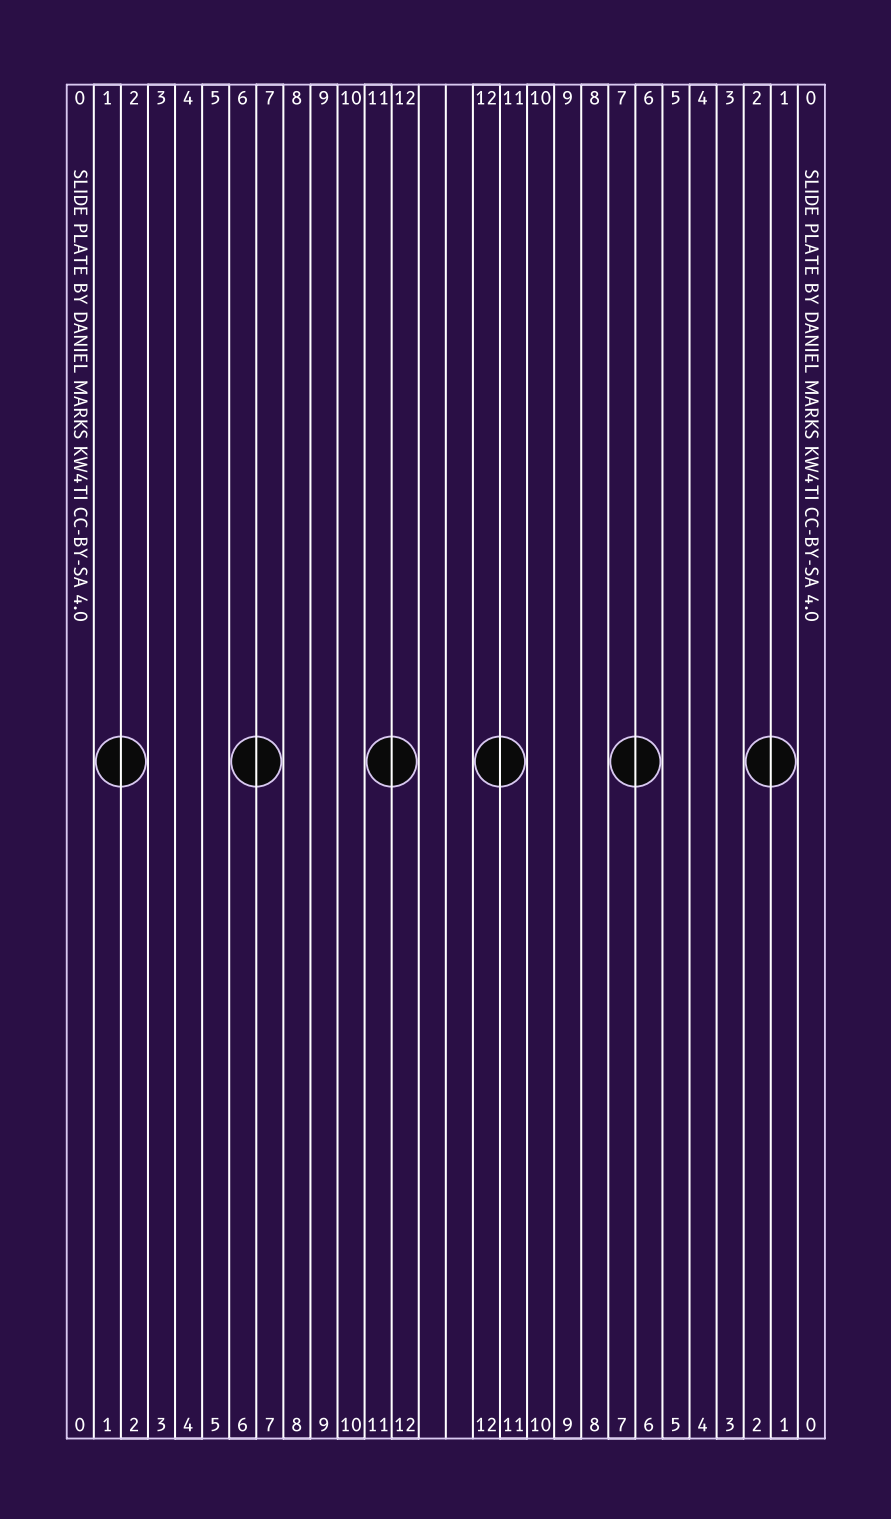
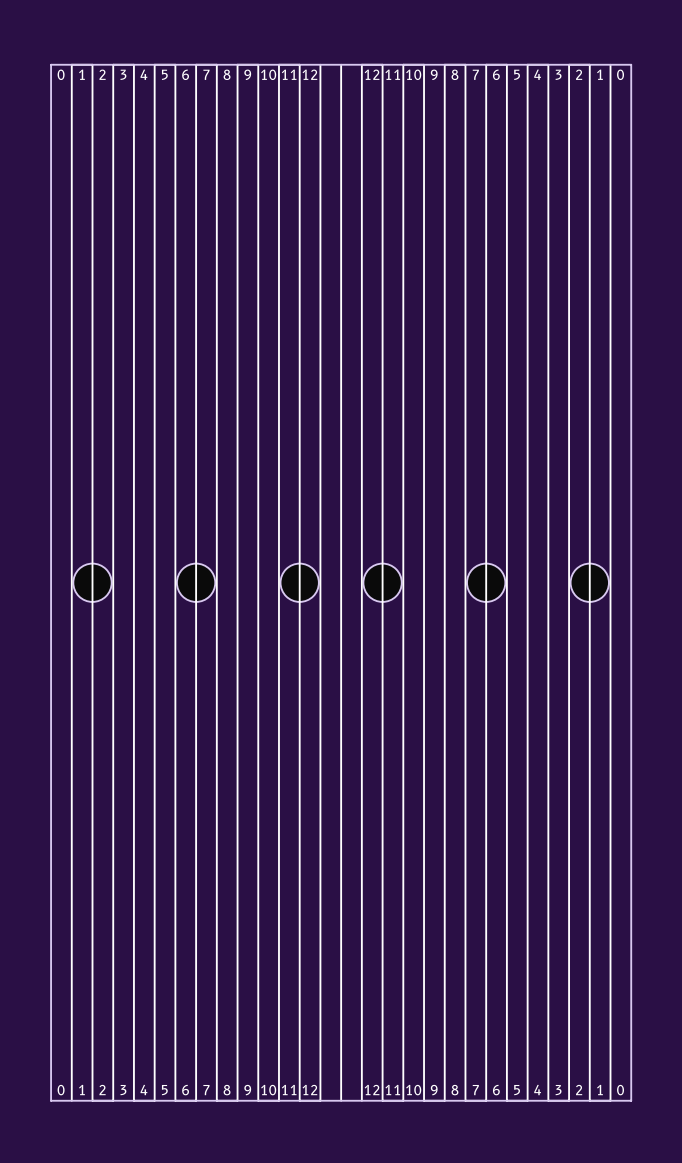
text: SLIDE PLATE BY DANIEL MARKS KW4TI CC-BY-SA 4.0 (80, 395) -> none
text: SLIDE PLATE BY DANIEL MARKS KW4TI CC-BY-SA 4.0 (811, 395) -> none

